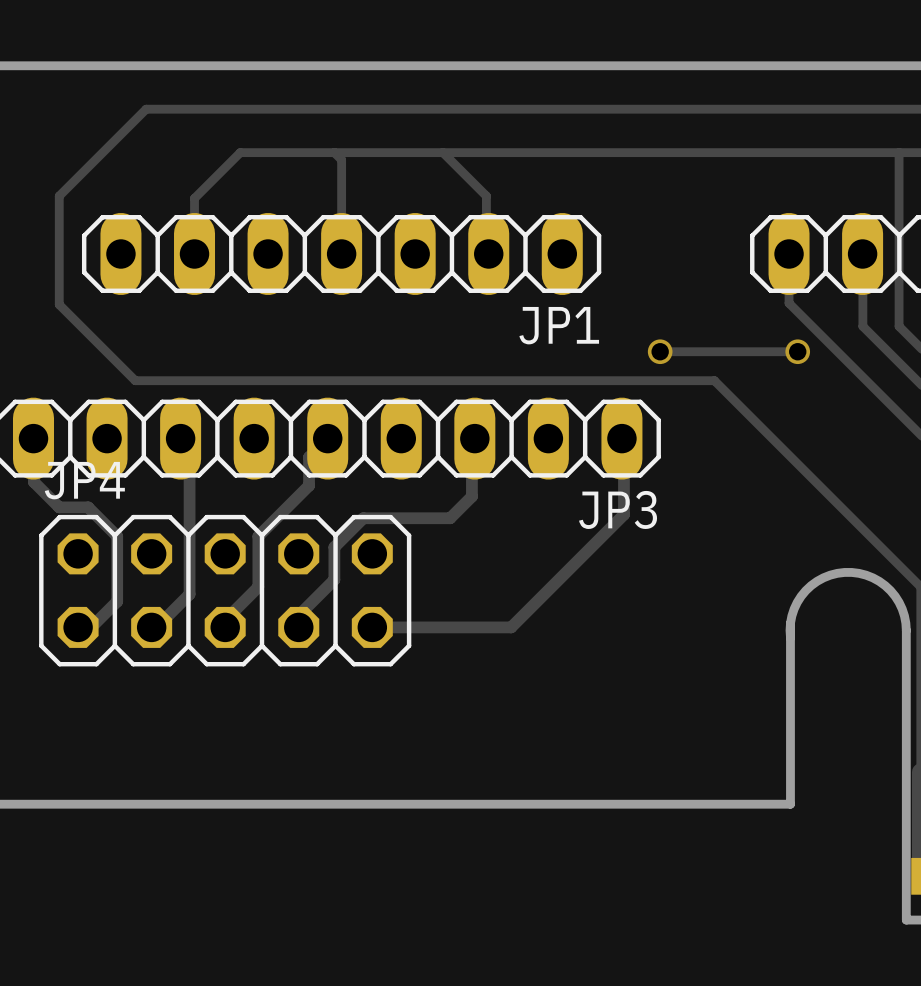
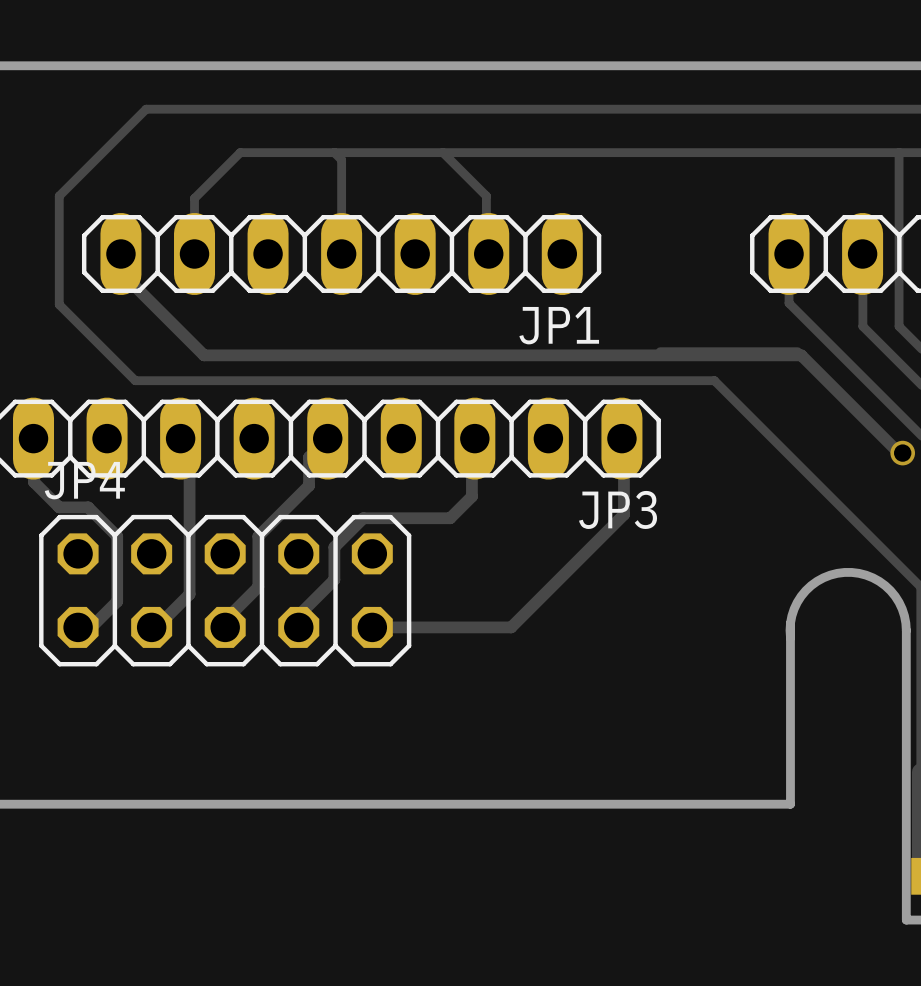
track: none -> (120, 254) (120, 272) (204, 355) (801, 355) (899, 453) (902, 453)
via: (660, 351) -> none
via: (797, 351) -> none
via: none -> (902, 453)

